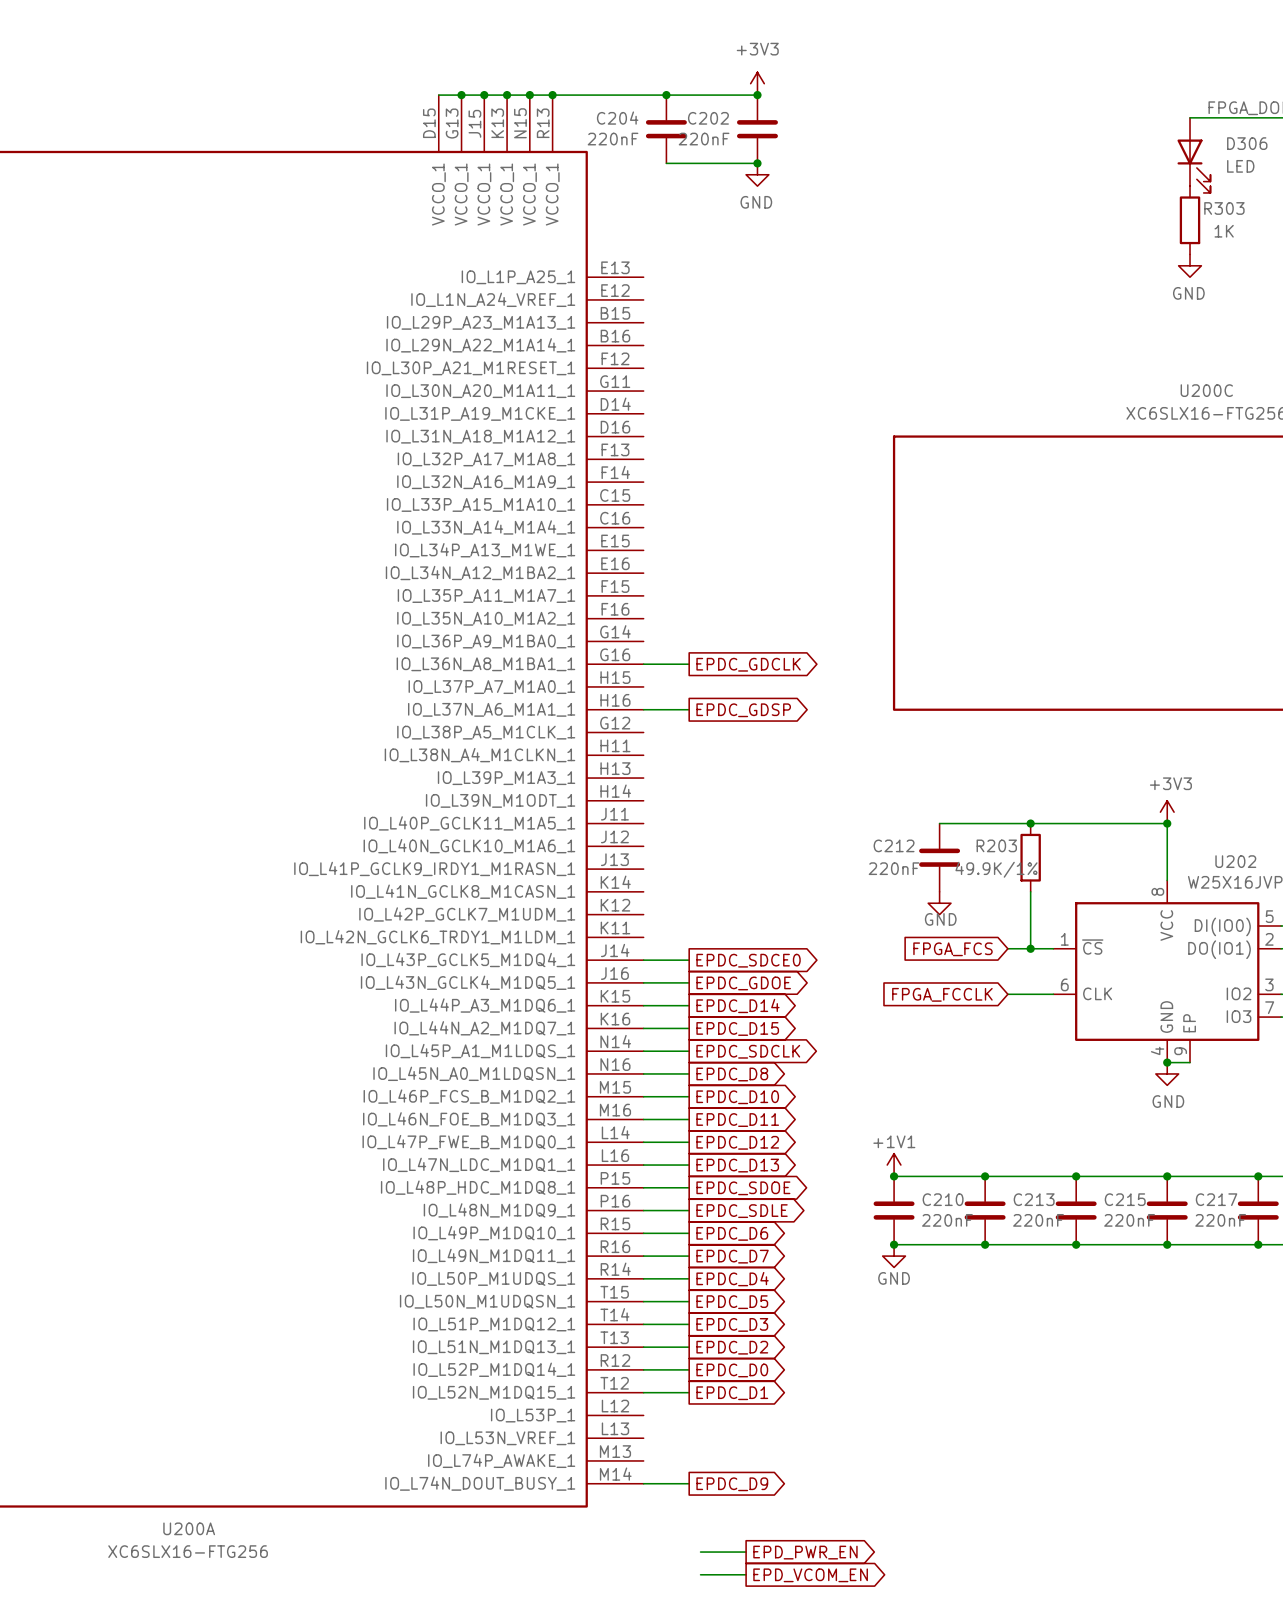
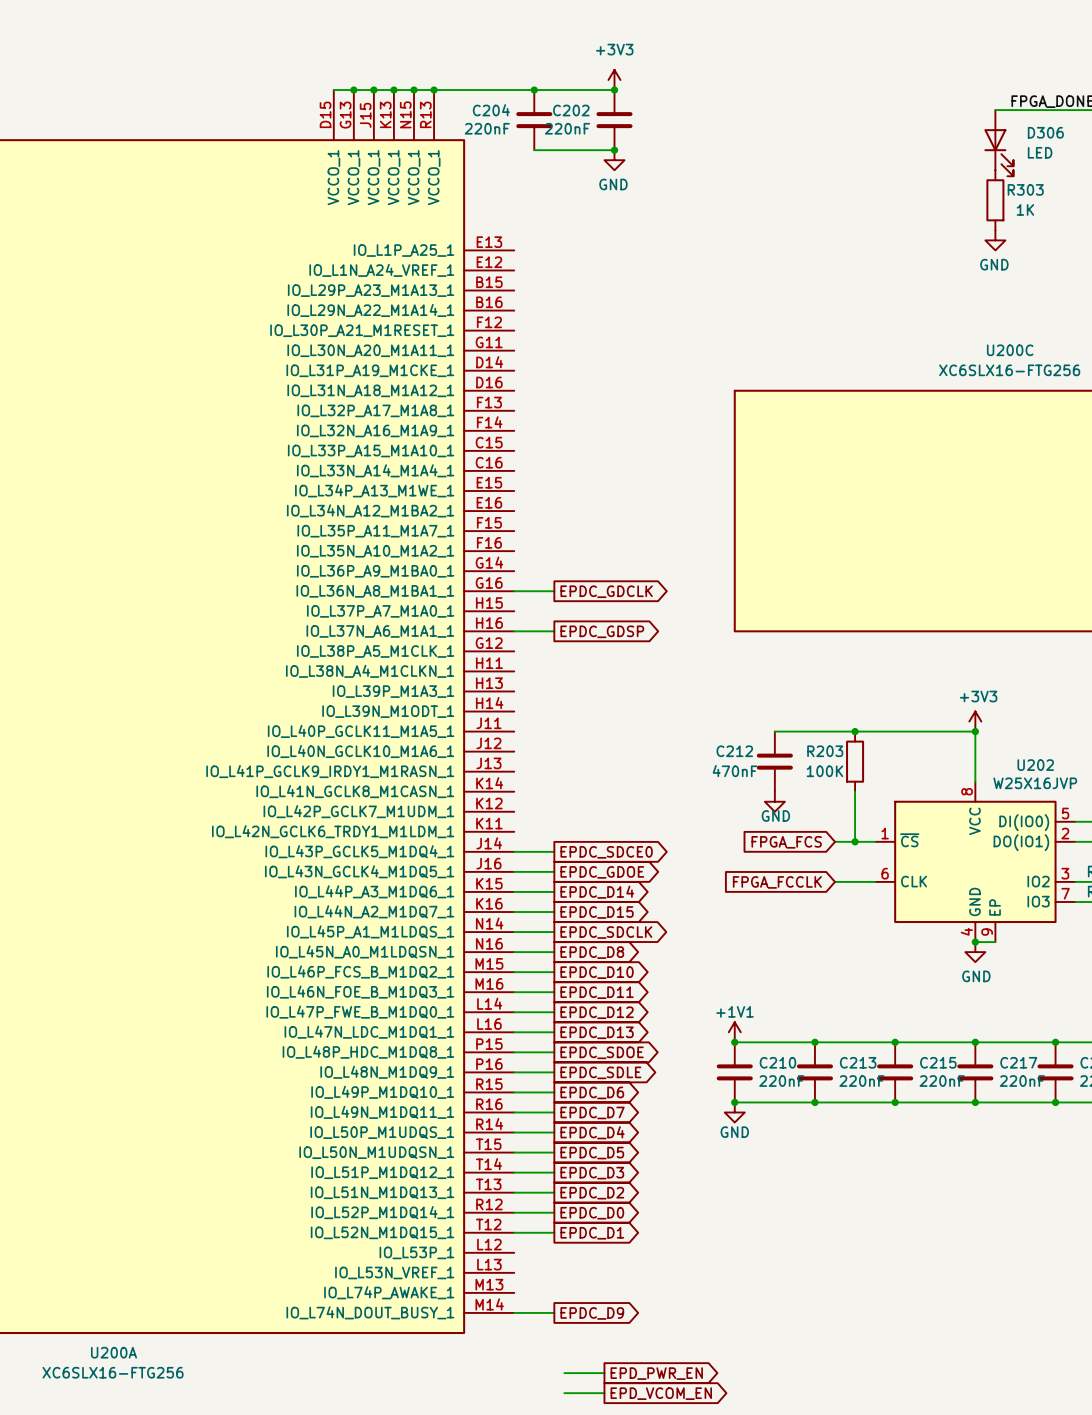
C212 value: 220nF (894, 868) -> 470nF (735, 771)
R203 value: 49.9K/1% (996, 869) -> 100K (824, 771)

